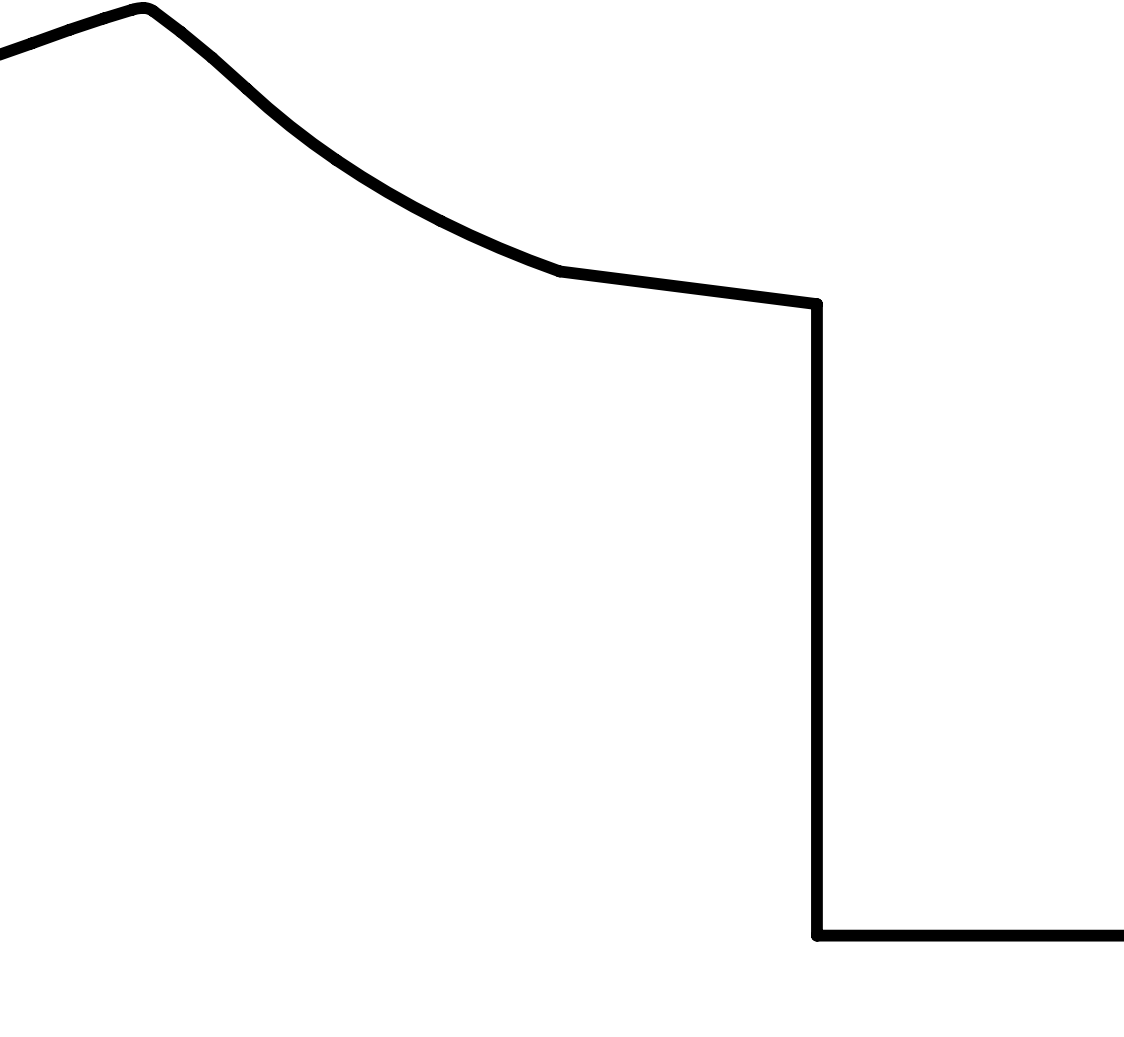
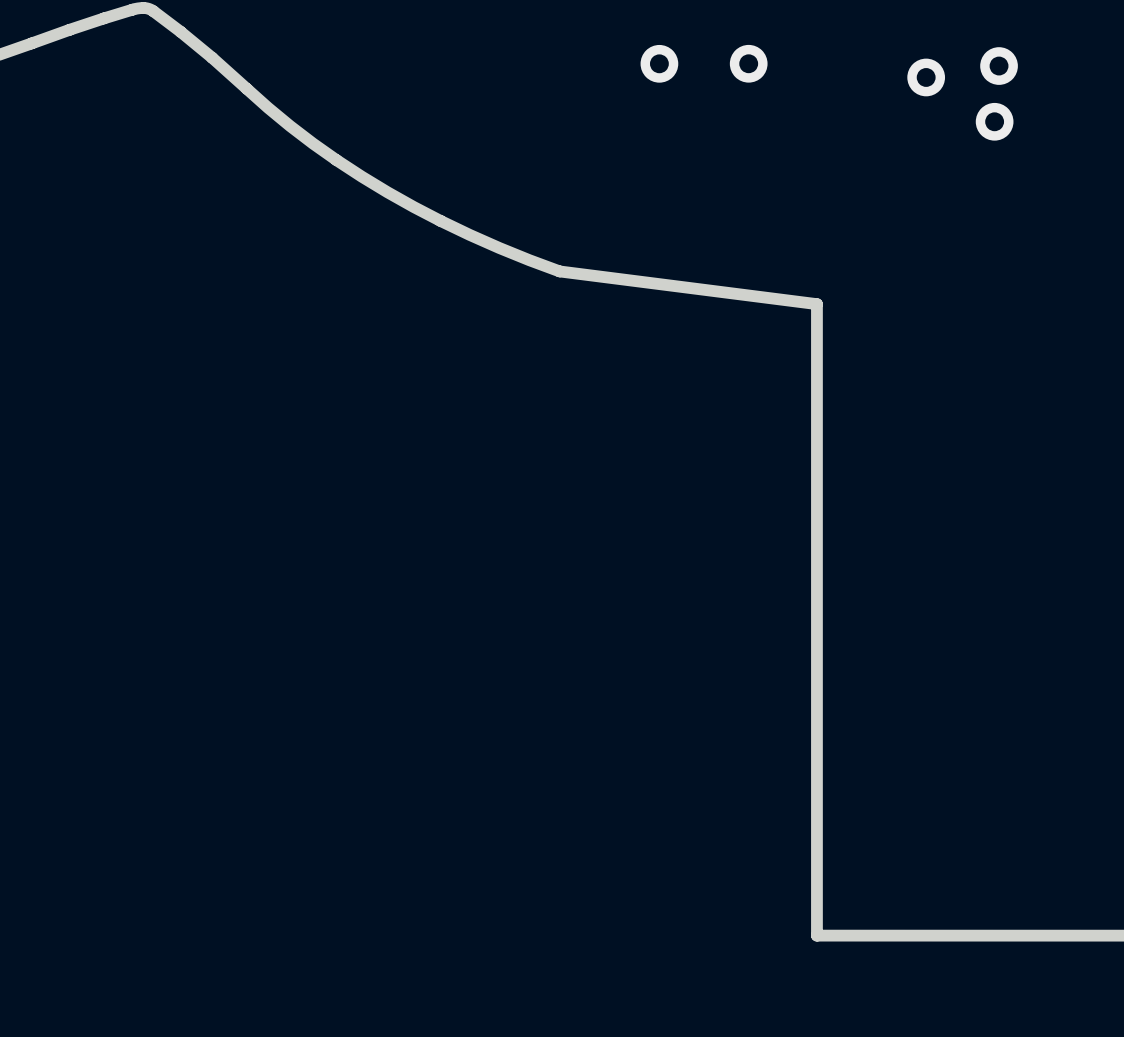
via: none -> (659, 63)
via: none -> (748, 63)
via: none -> (999, 66)
via: none -> (926, 77)
via: none -> (994, 121)

